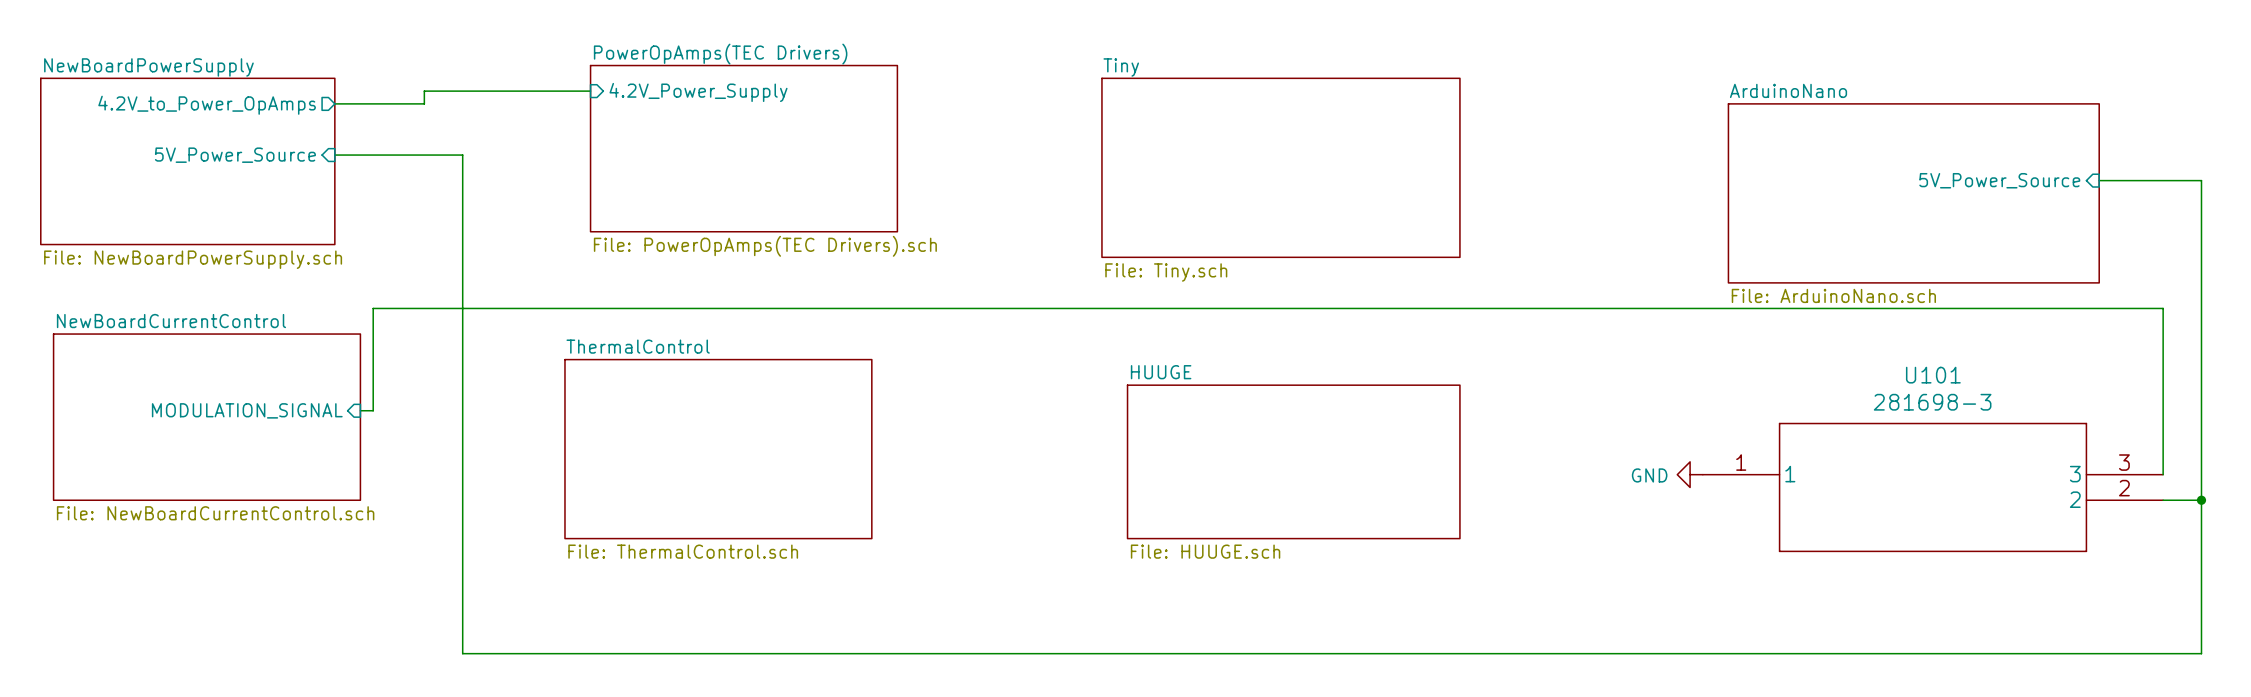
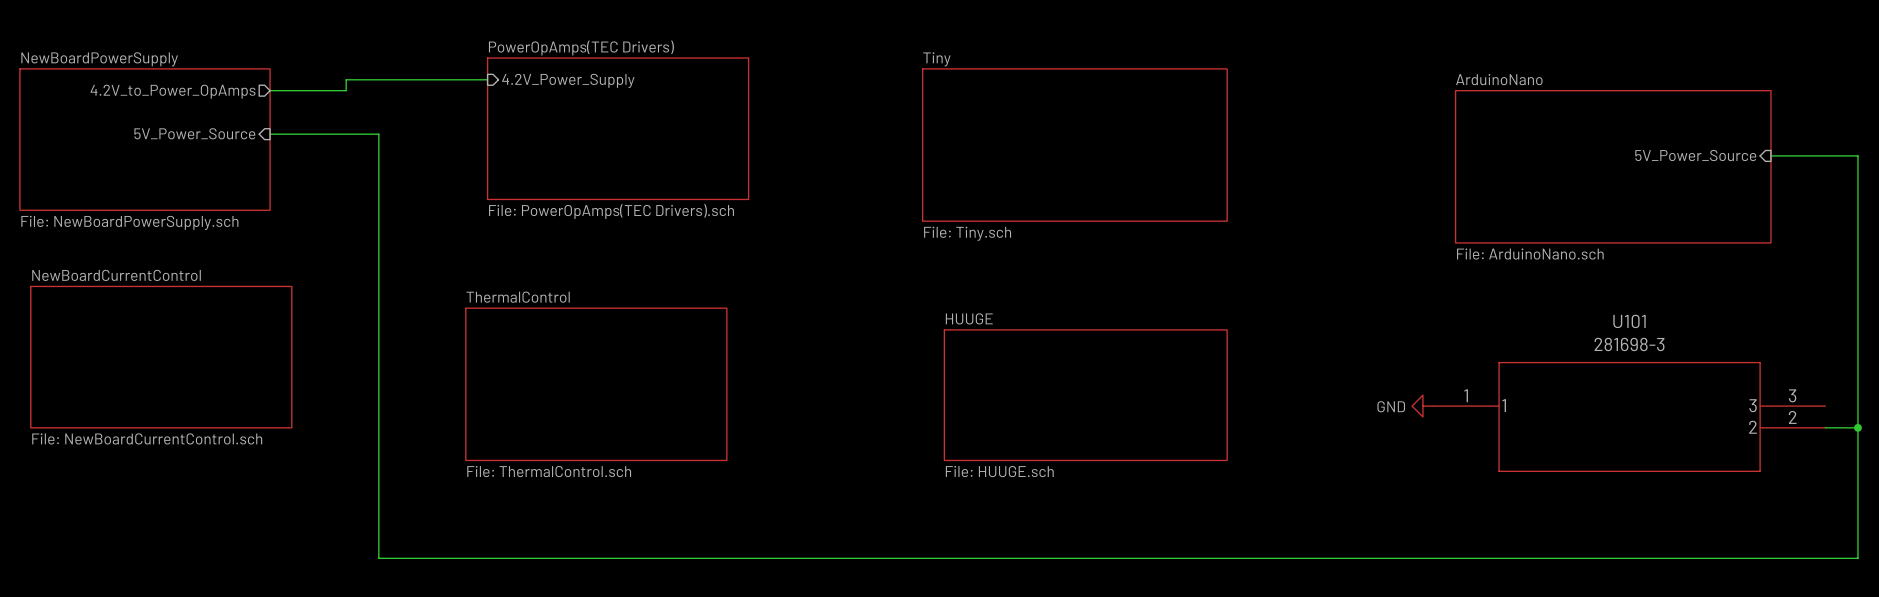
sheet pin: MODULATION_SIGNAL (247, 410) -> none
wire: (360, 410) (373, 410) (373, 308) (2163, 308) (2163, 474) -> none

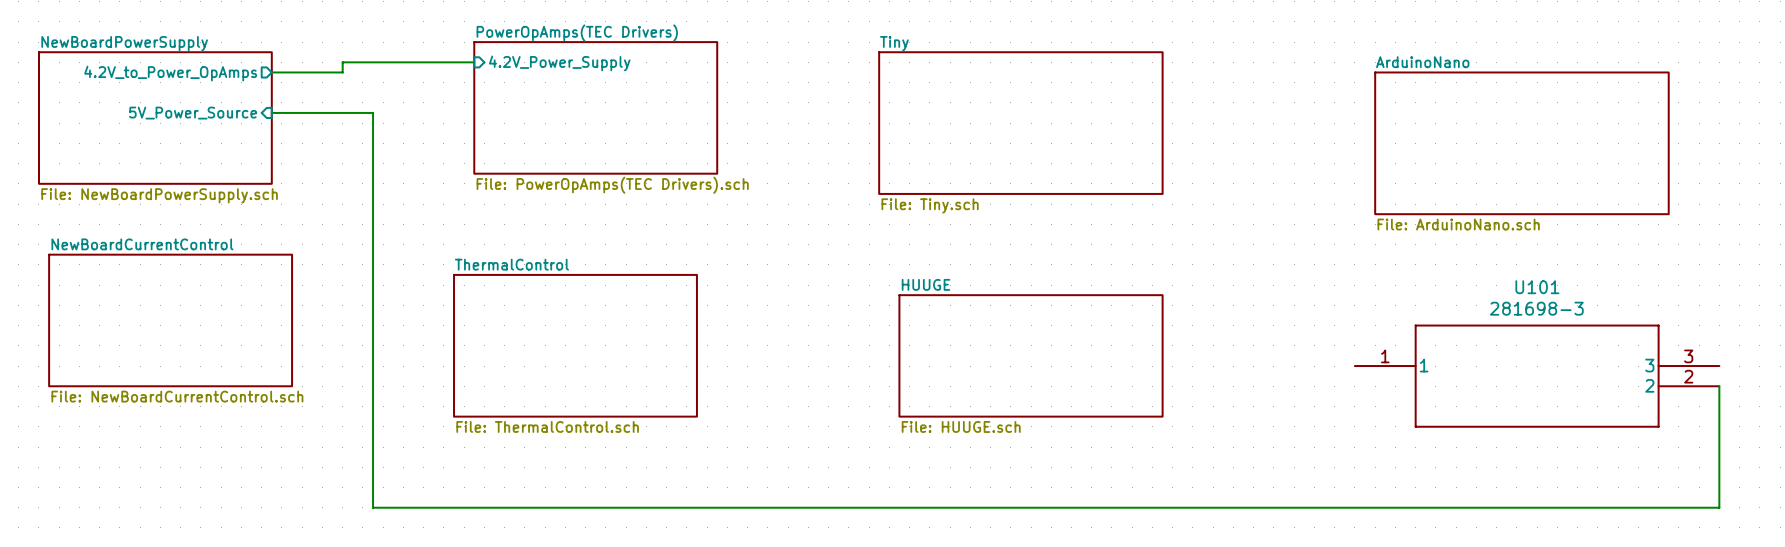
sheet pin: 5V_Power_Source (1695, 155) -> none
wire: (1770, 155) (1857, 155) (1857, 558) (1825, 558) -> none
power symbol: GND (1422, 406) -> none
wire: (1825, 427) (1857, 427) -> (1719, 386) (1719, 507)
junction: (1857, 427) -> none

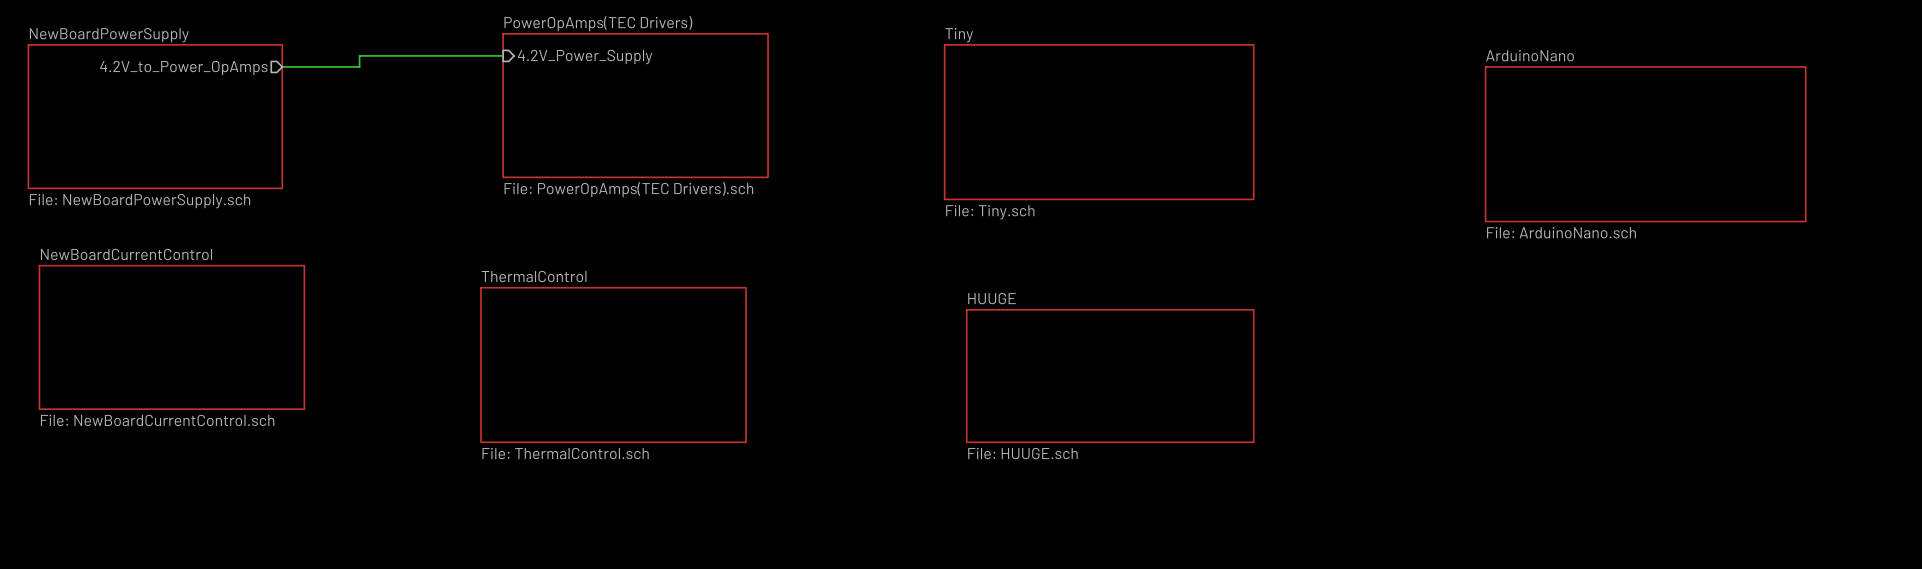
wire: (271, 112) (373, 112) (373, 507) (1719, 507) (1719, 386) -> none
sheet pin: 5V_Power_Source (193, 113) -> none
U101: 281698-3 (1537, 376) -> none

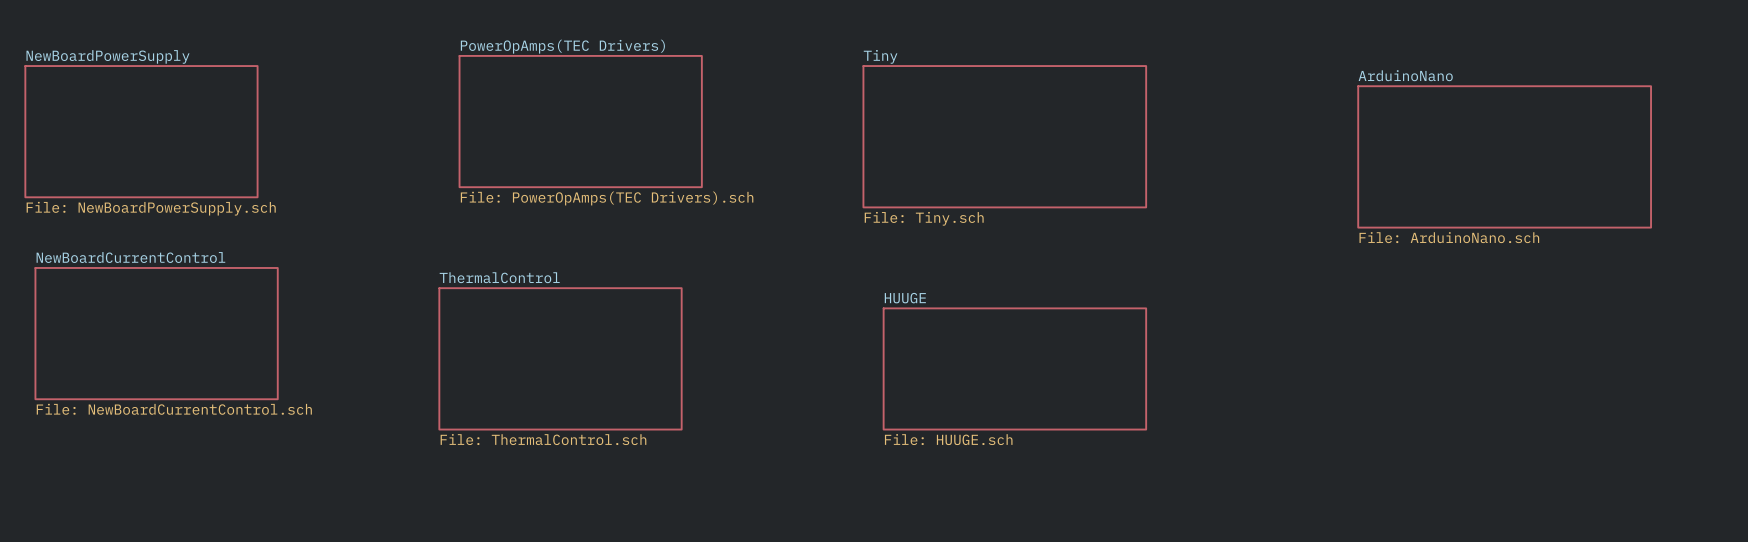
wire: (503, 55) (359, 55) (359, 66) (282, 66) -> none
sheet pin: 4.2V_Power_Supply (585, 57) -> none
sheet pin: 4.2V_to_Power_OpAmps (183, 68) -> none

